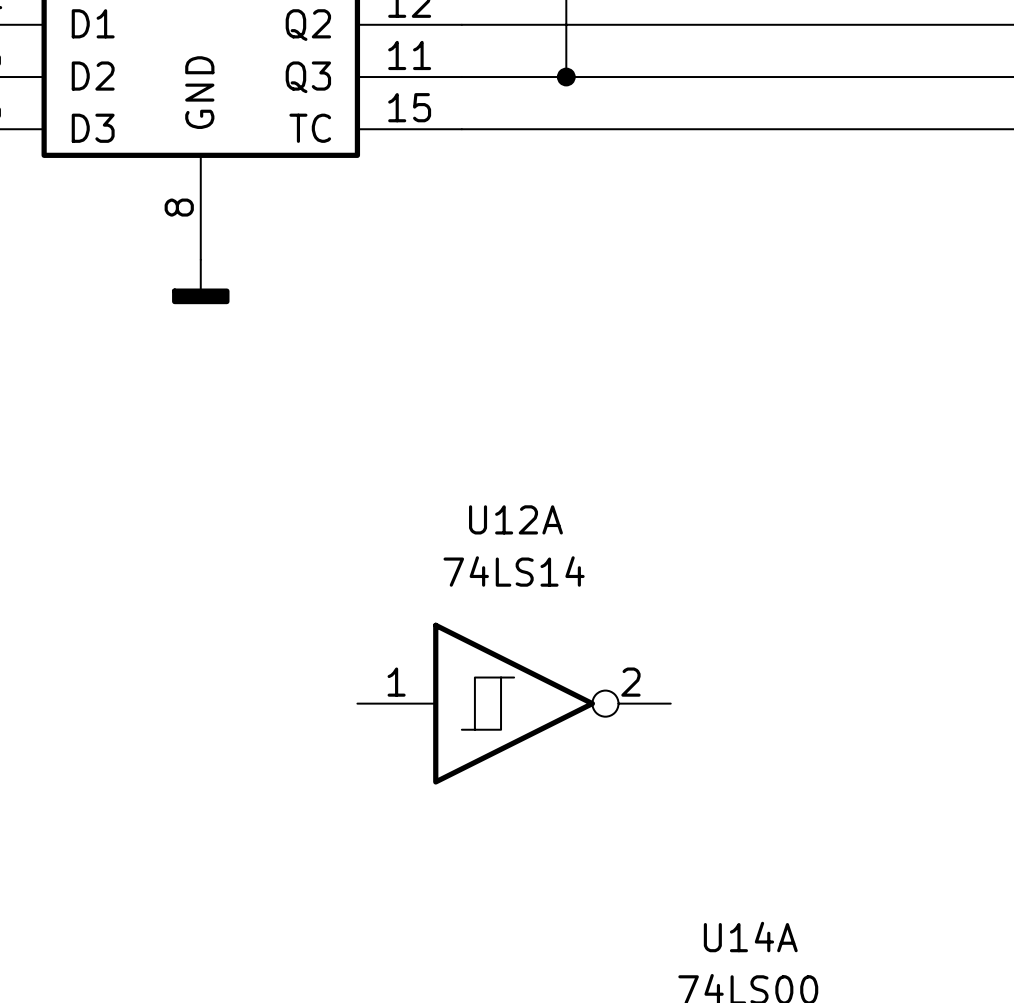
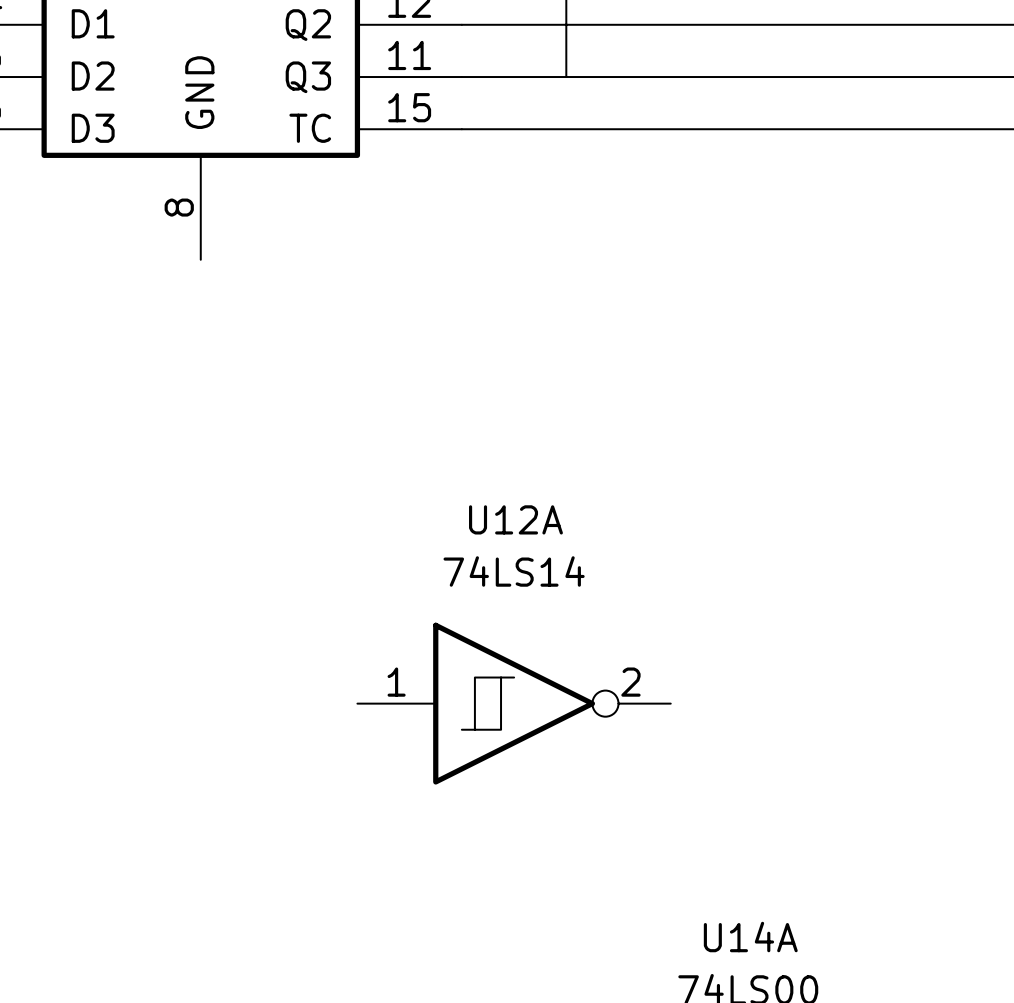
junction: (566, 77) -> none
power symbol: (200, 281) -> none

